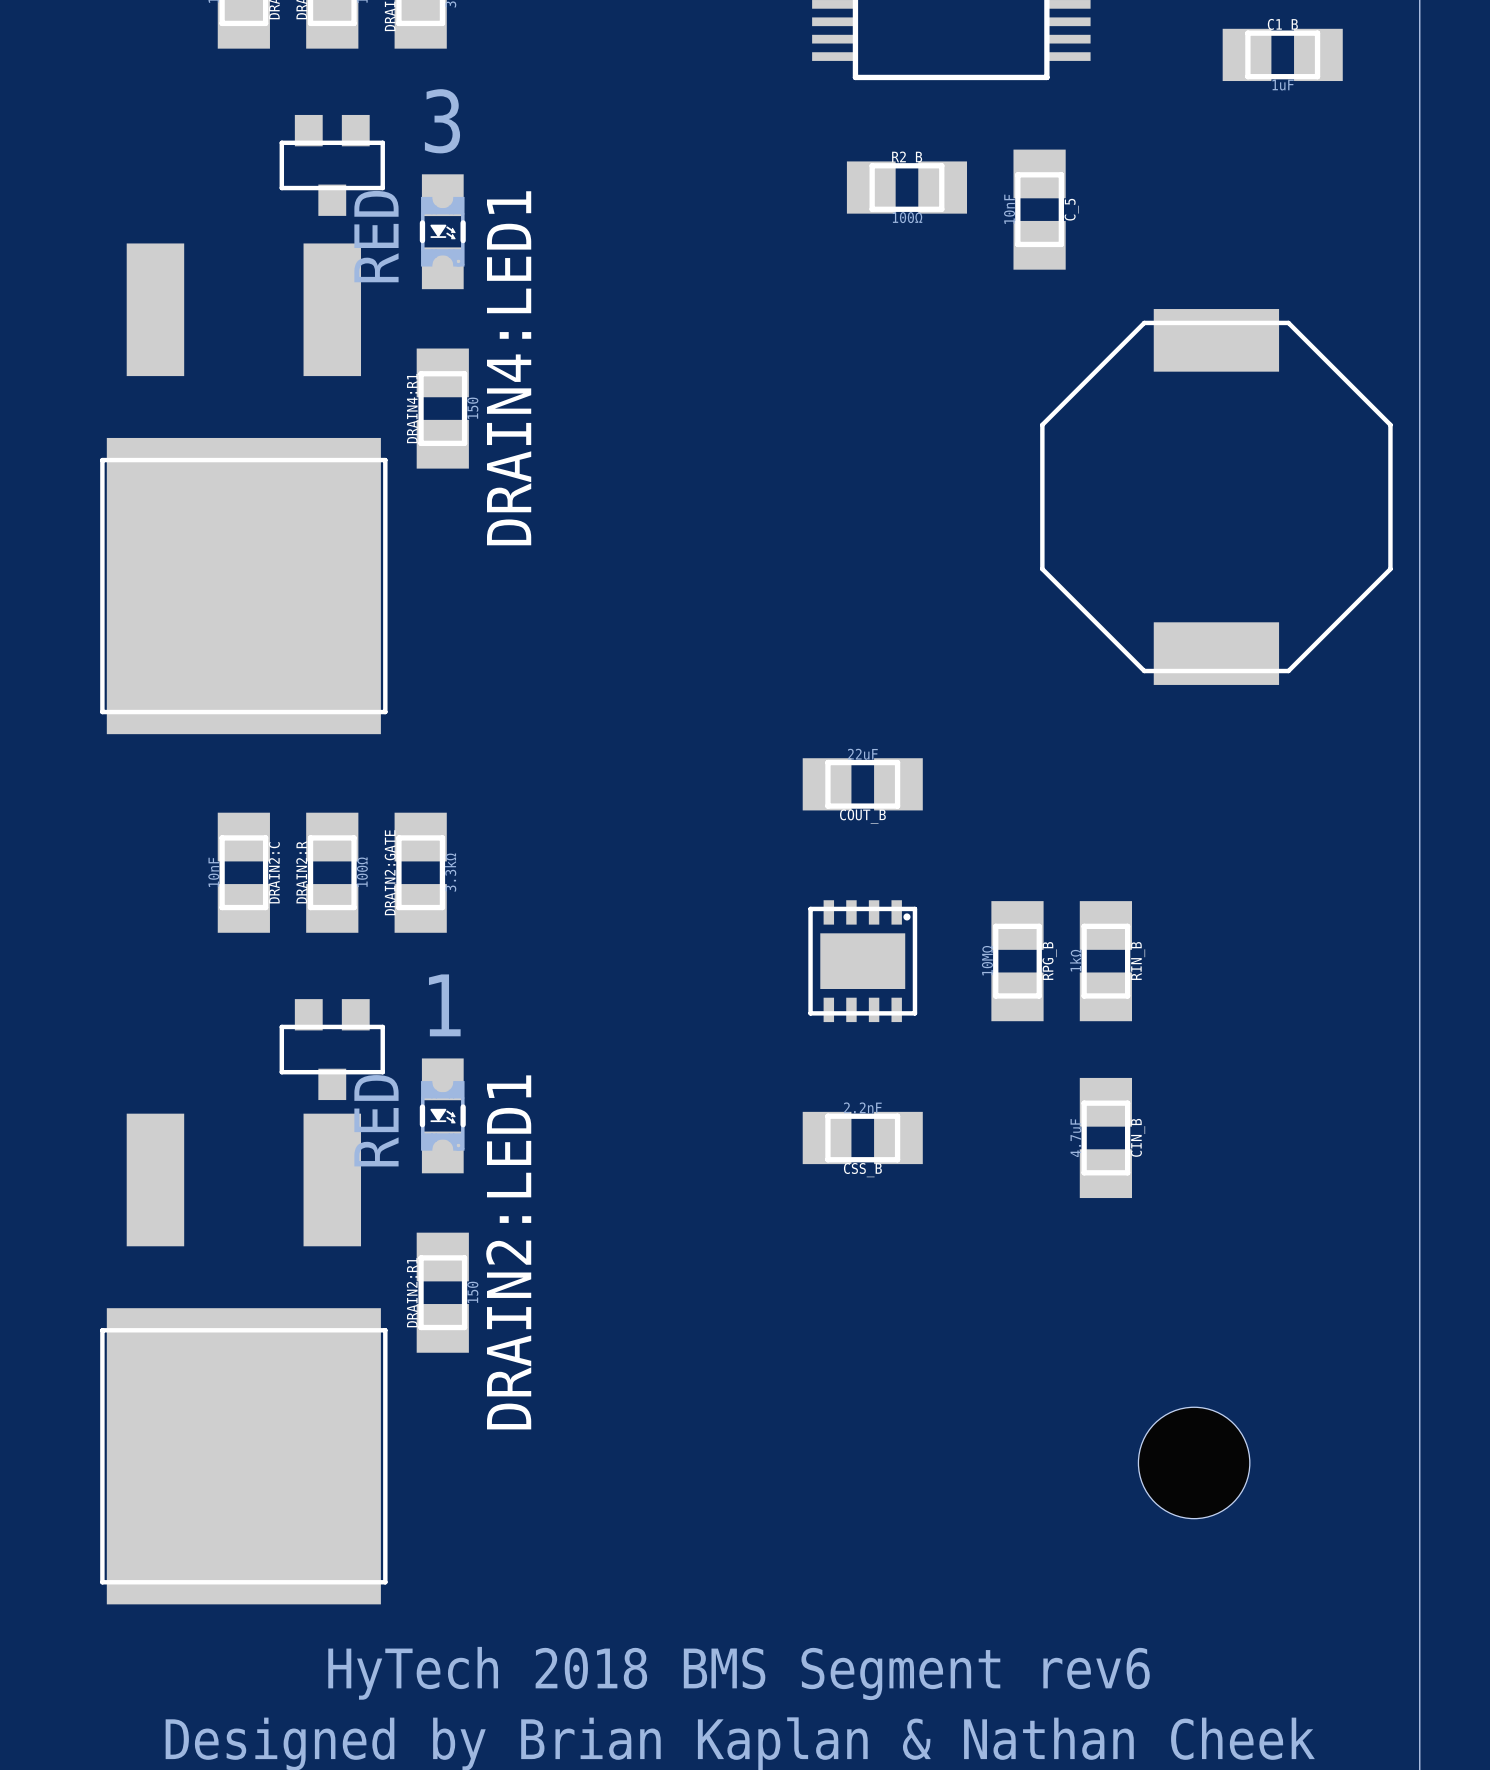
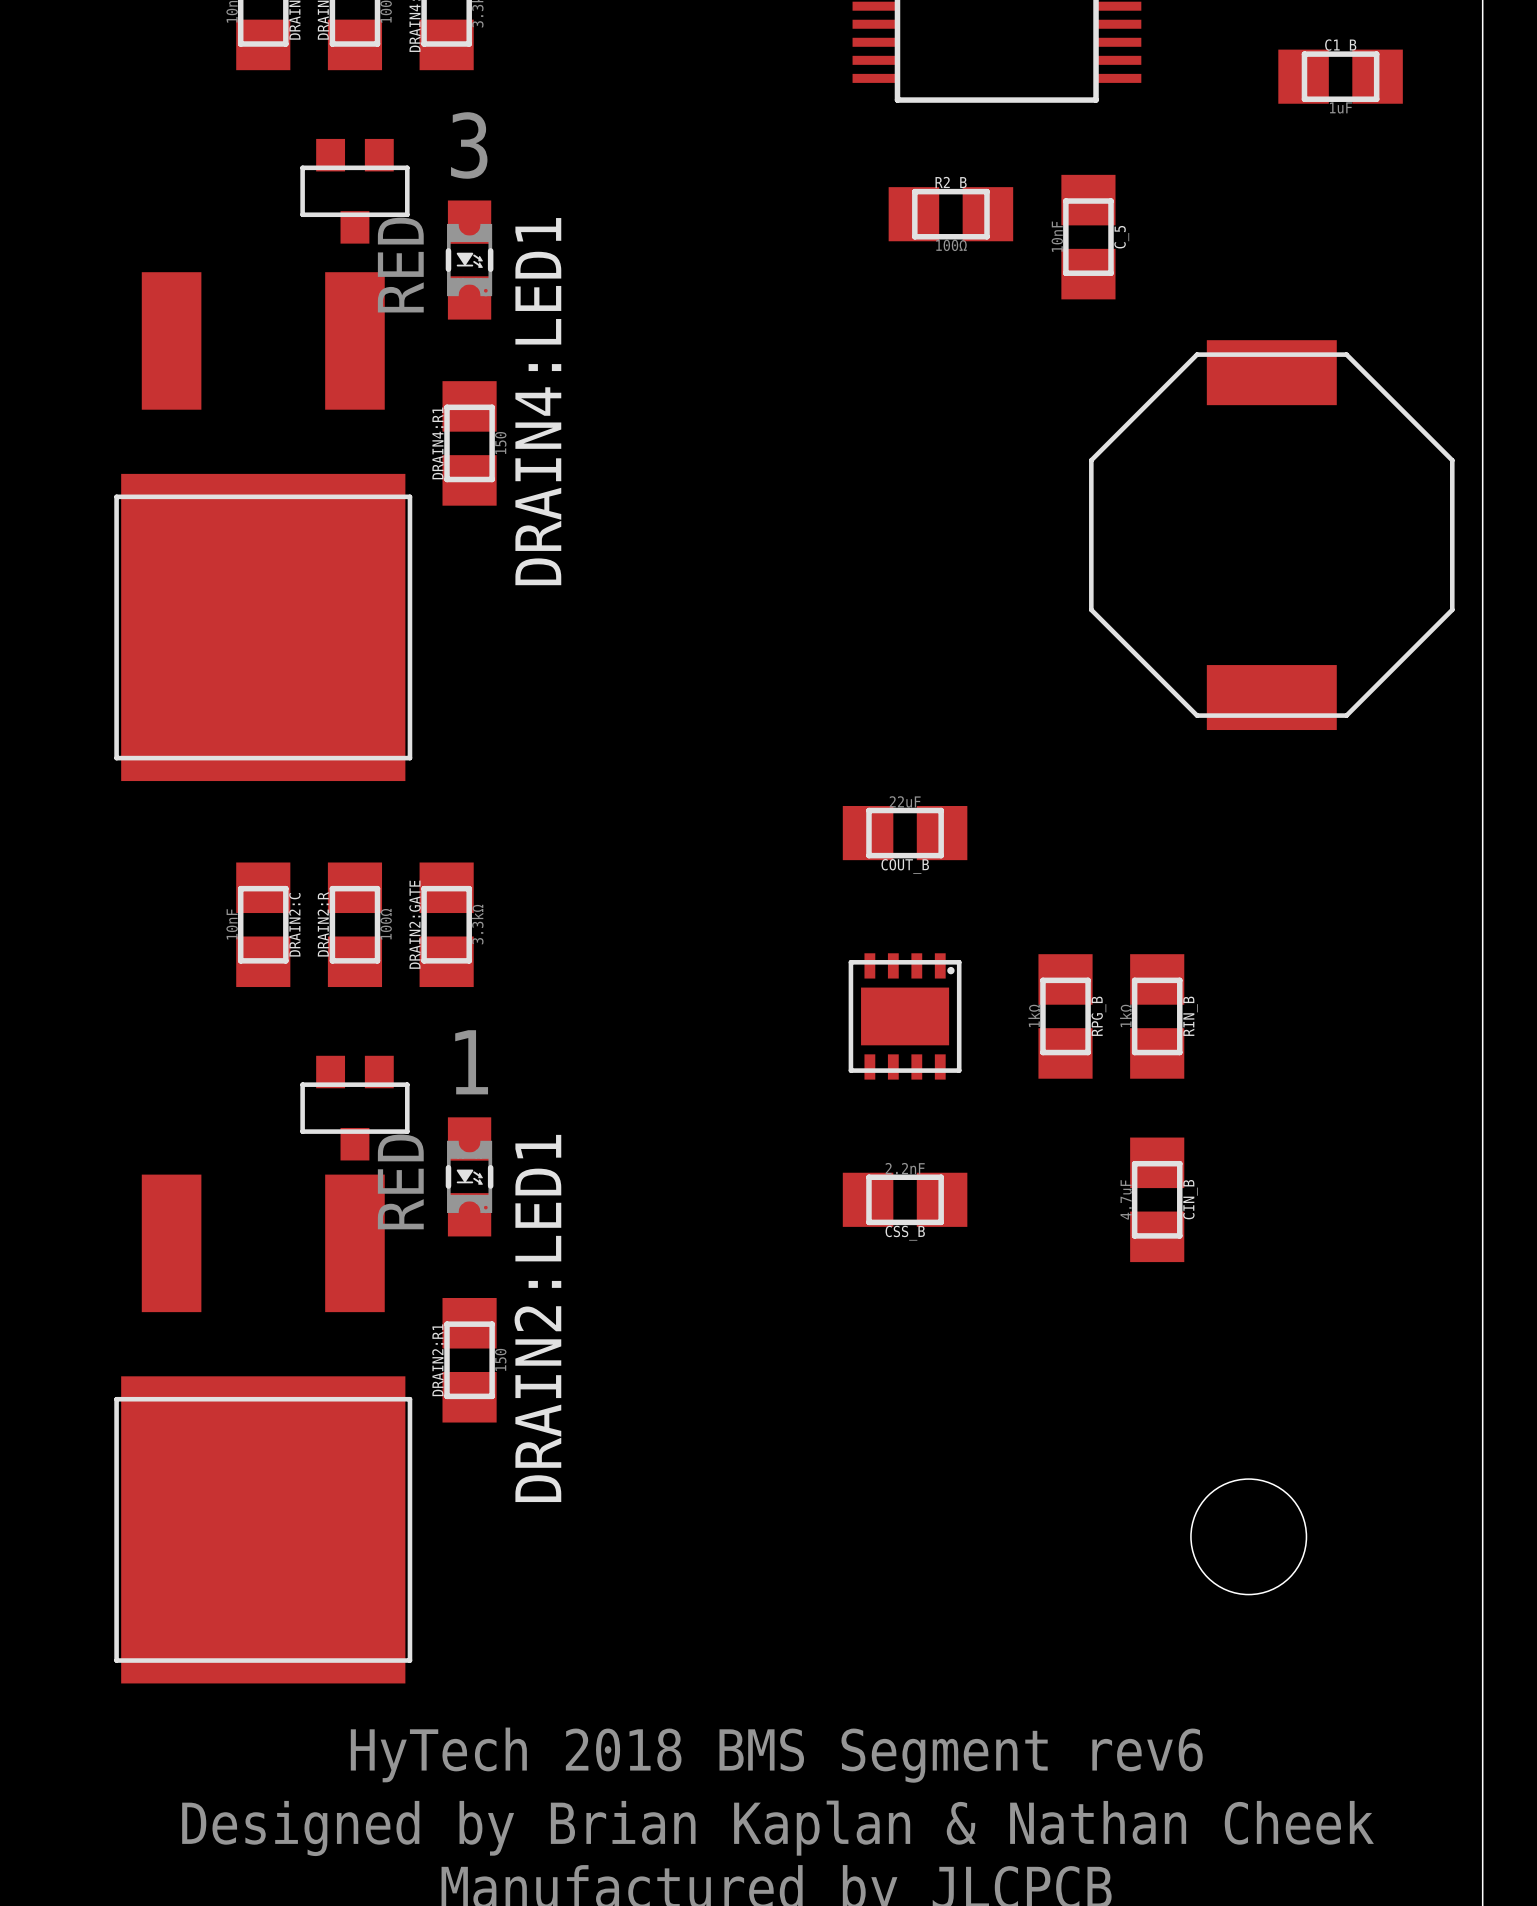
RPG_B value: 10MΩ (987, 960) -> 1kΩ (1034, 1015)

